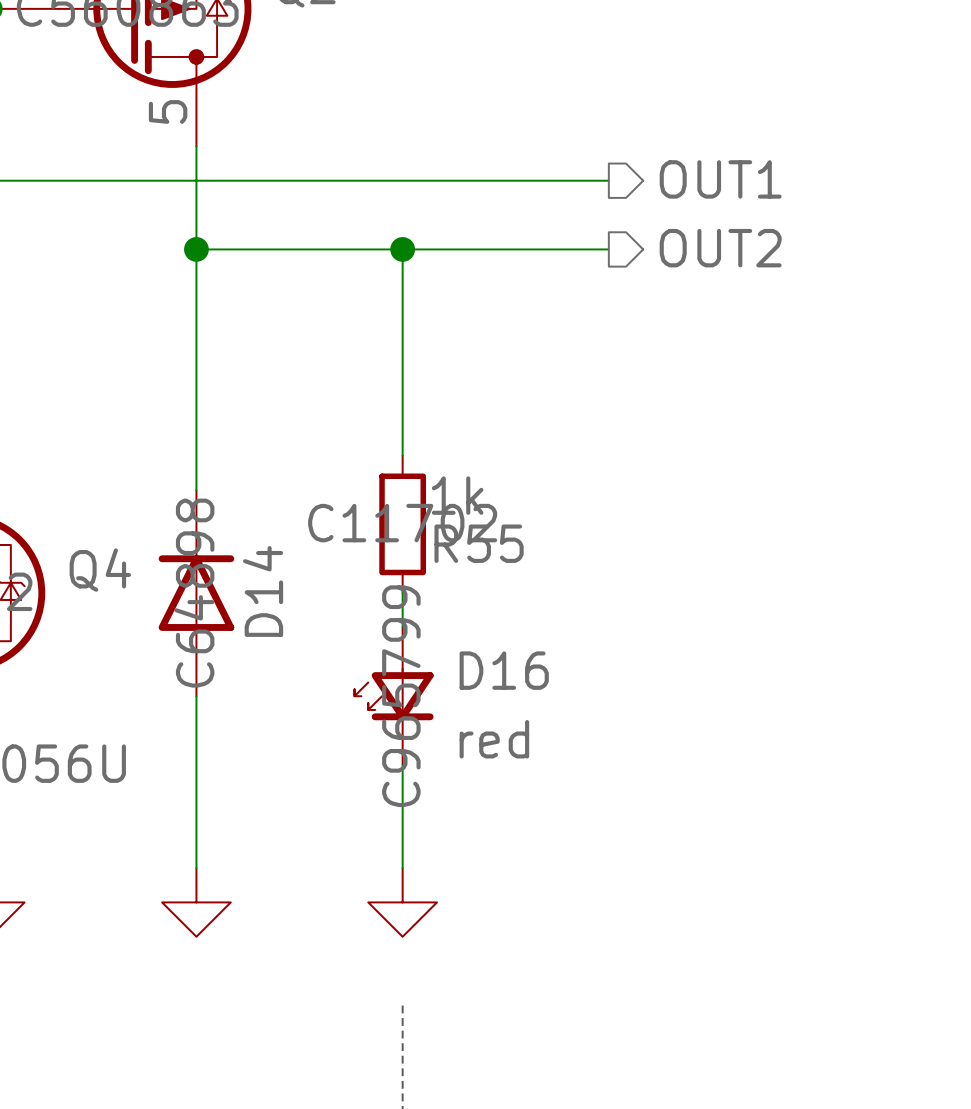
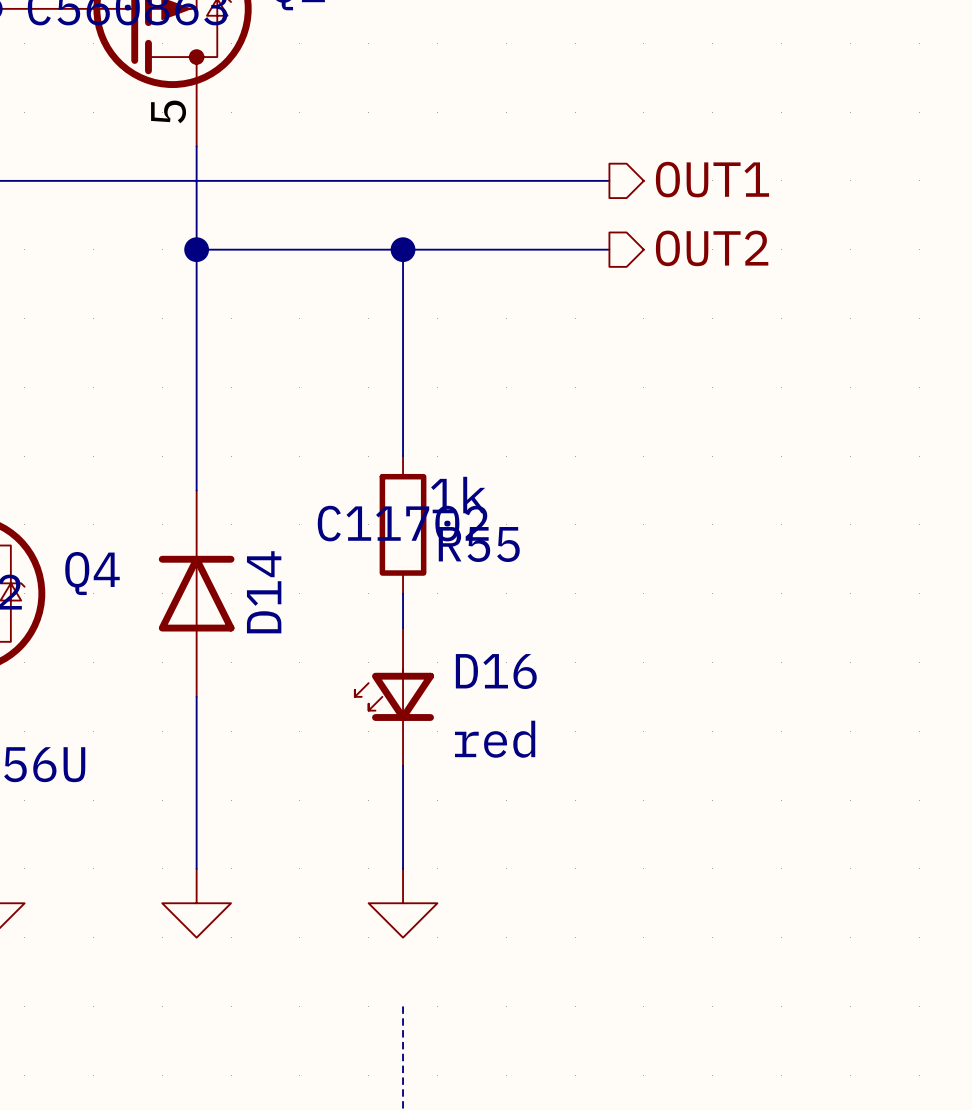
D14 text: C64898 (194, 593) -> none
D16 text: C965799 (401, 696) -> none

